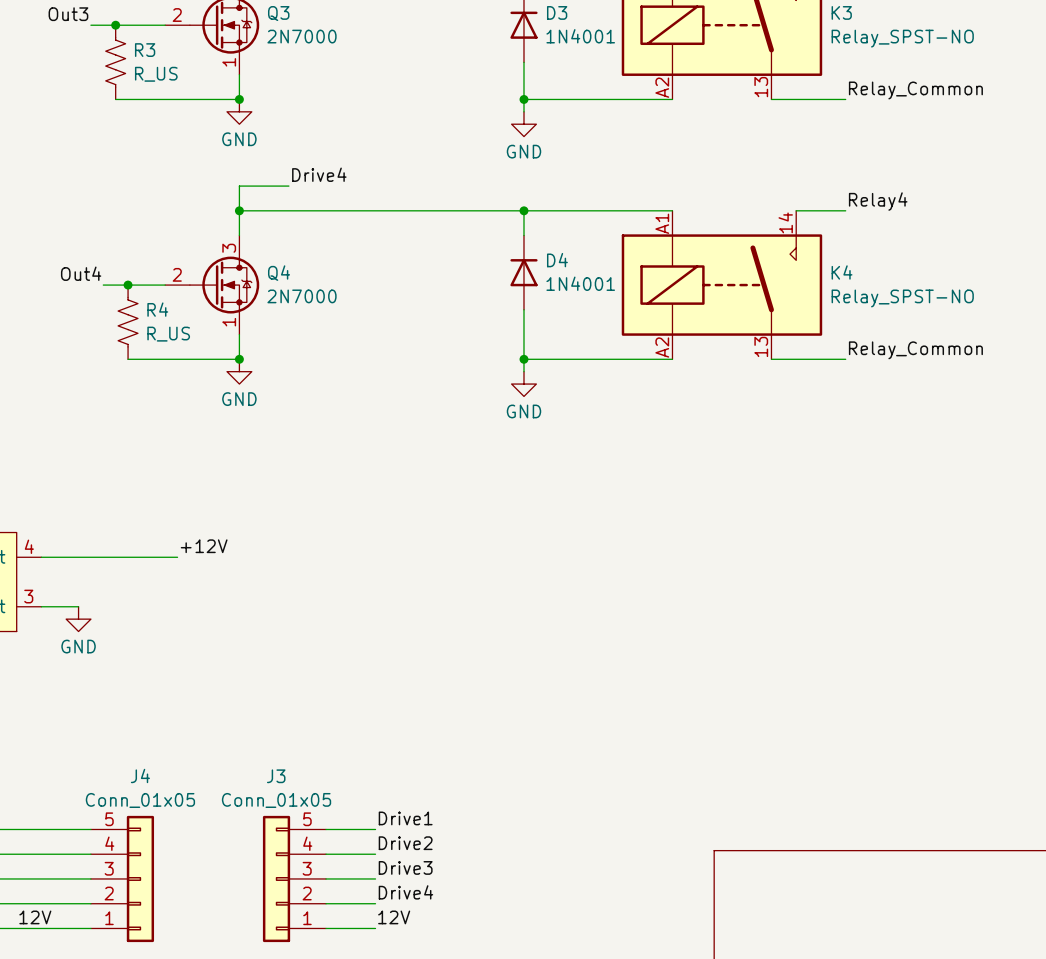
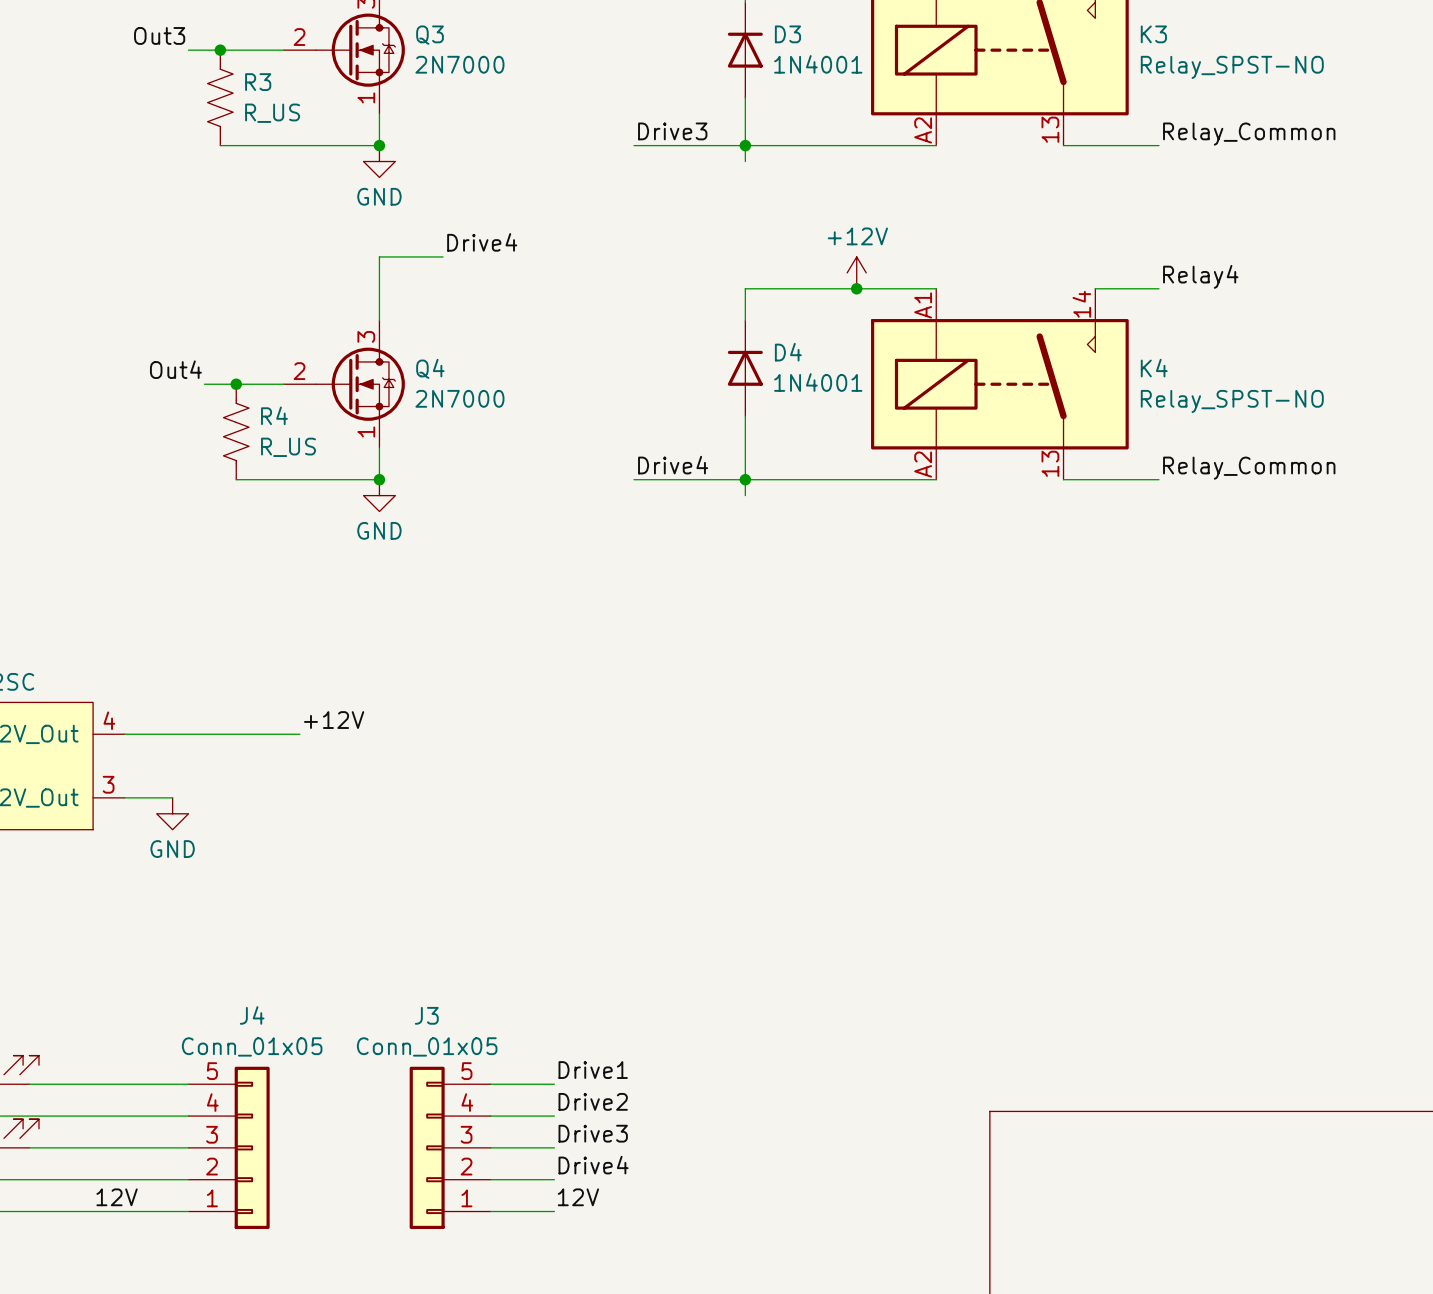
label: none -> Drive3 (672, 131)
wire: none -> (633, 145) (745, 145)
power symbol: GND (523, 124) -> none
power symbol: none -> +12V (856, 272)
wire: (239, 210) (523, 210) -> none
junction: (239, 210) -> none
junction: (523, 210) -> none
junction: none -> (856, 288)
label: none -> Drive4 (673, 465)
wire: none -> (633, 479) (745, 479)
power symbol: GND (523, 384) -> none

